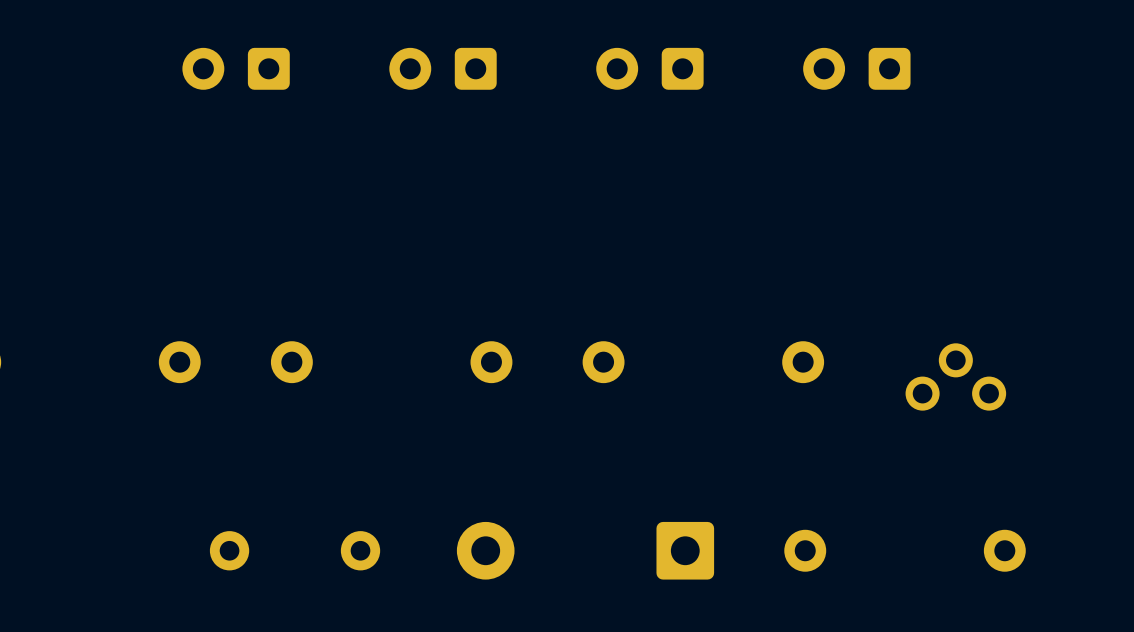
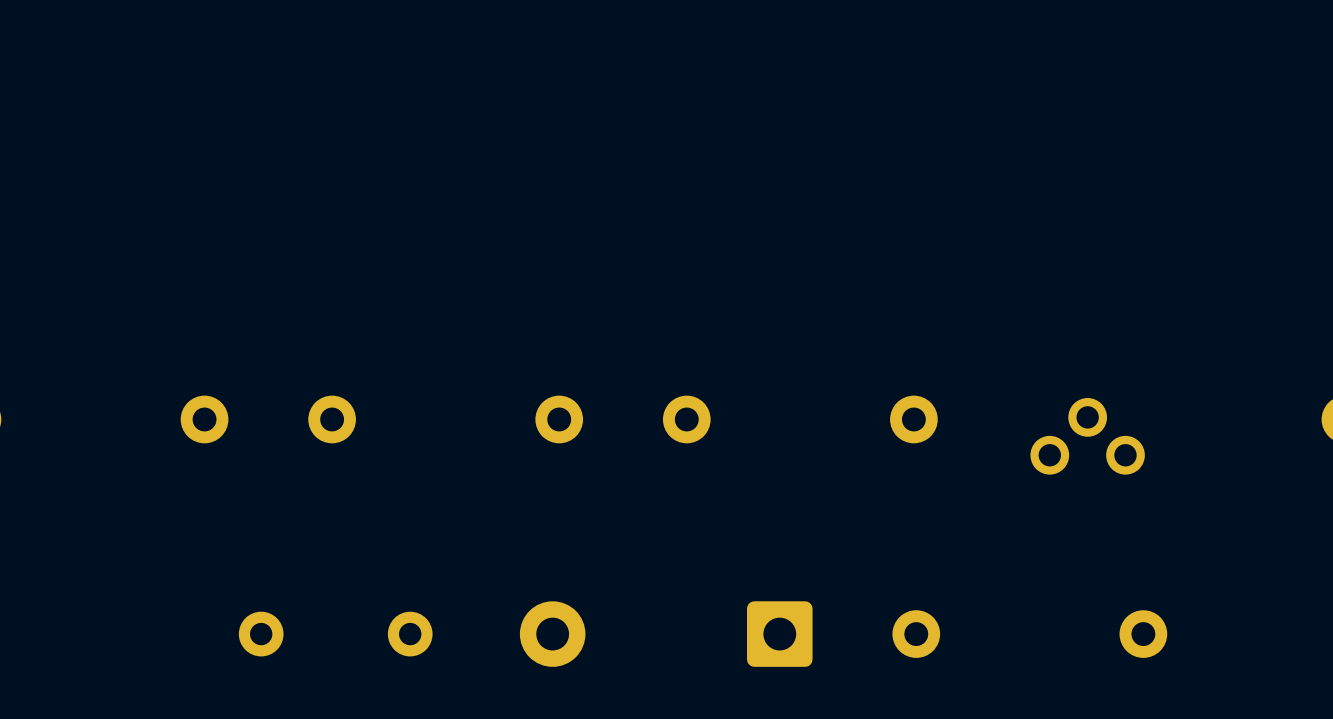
part: (236, 68) -> none
part: (443, 68) -> none
part: (649, 68) -> none
part: (856, 68) -> none

